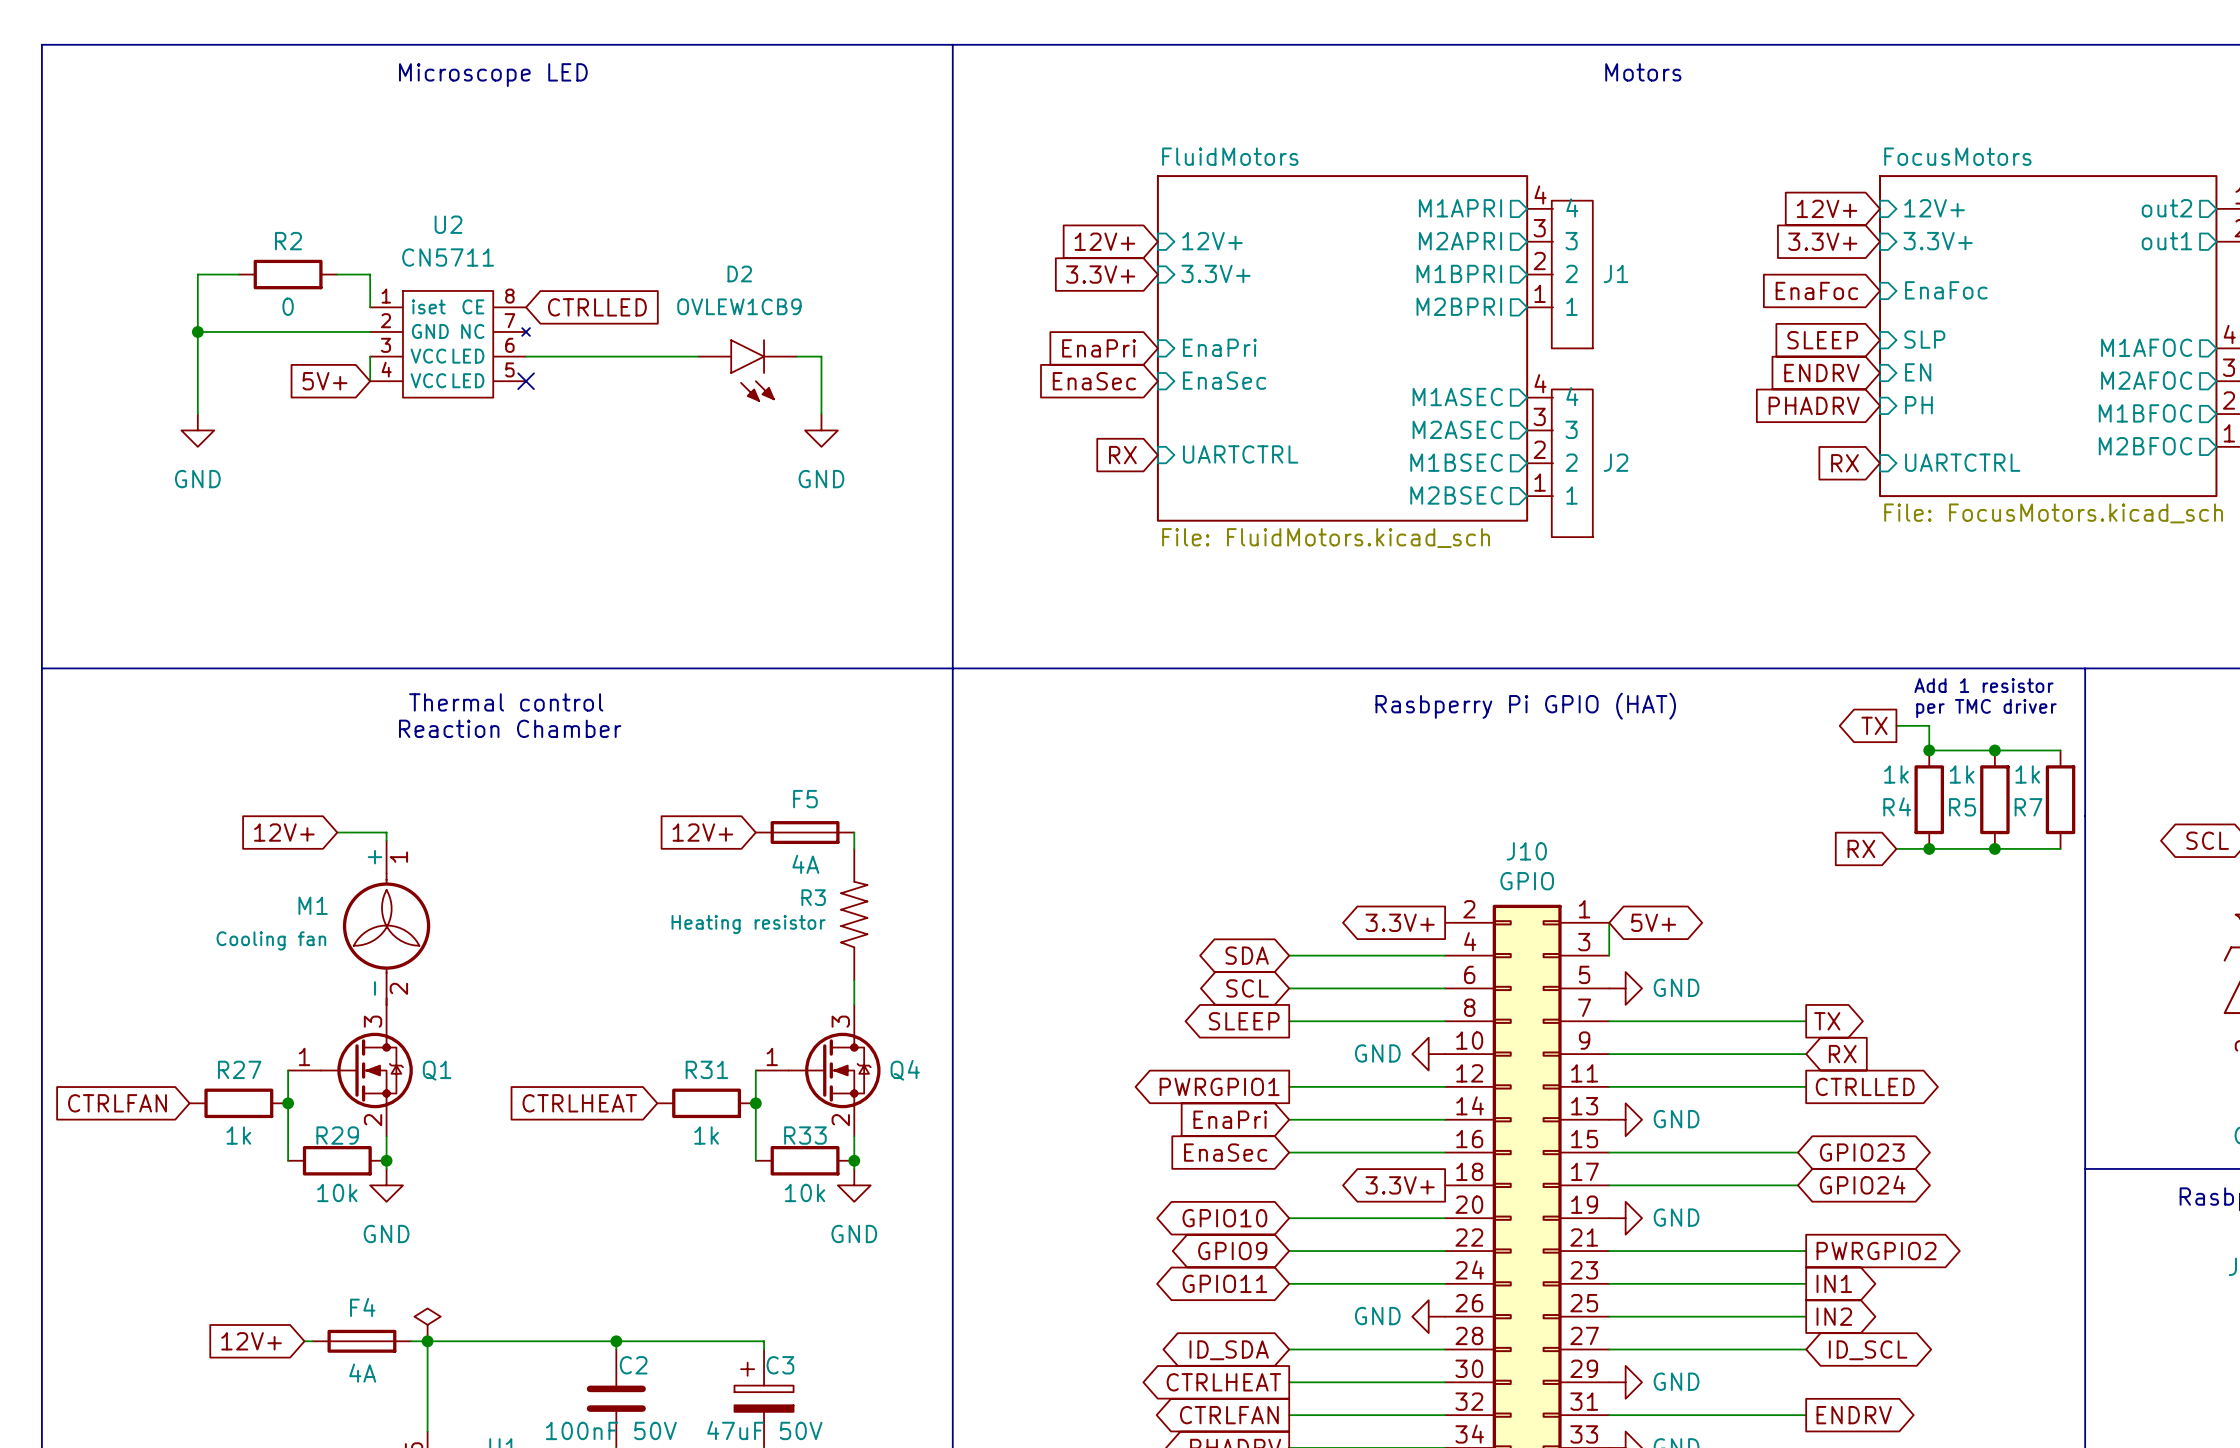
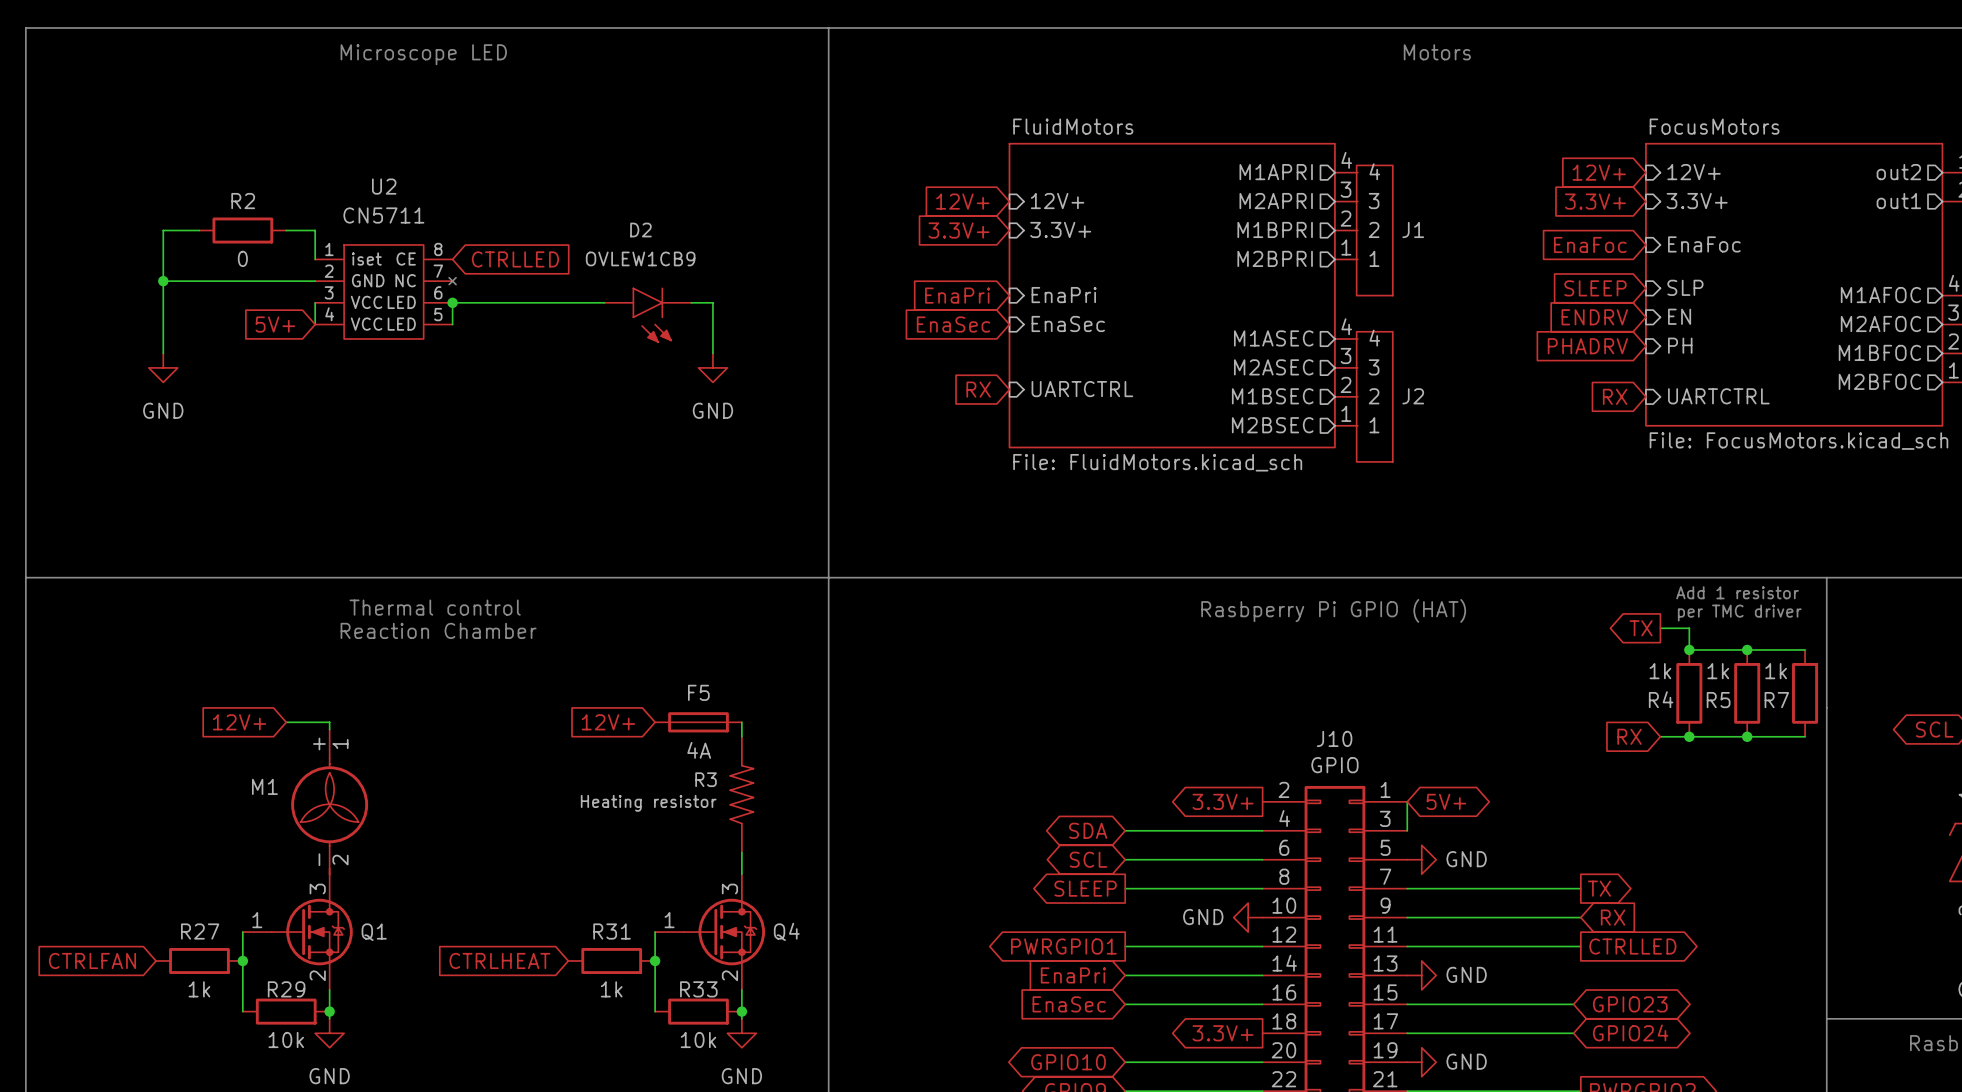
wire: none -> (452, 302) (452, 324)
junction: none -> (452, 302)
no-connect mark: (526, 381) -> none
M1 text: Cooling fan (271, 940) -> none

